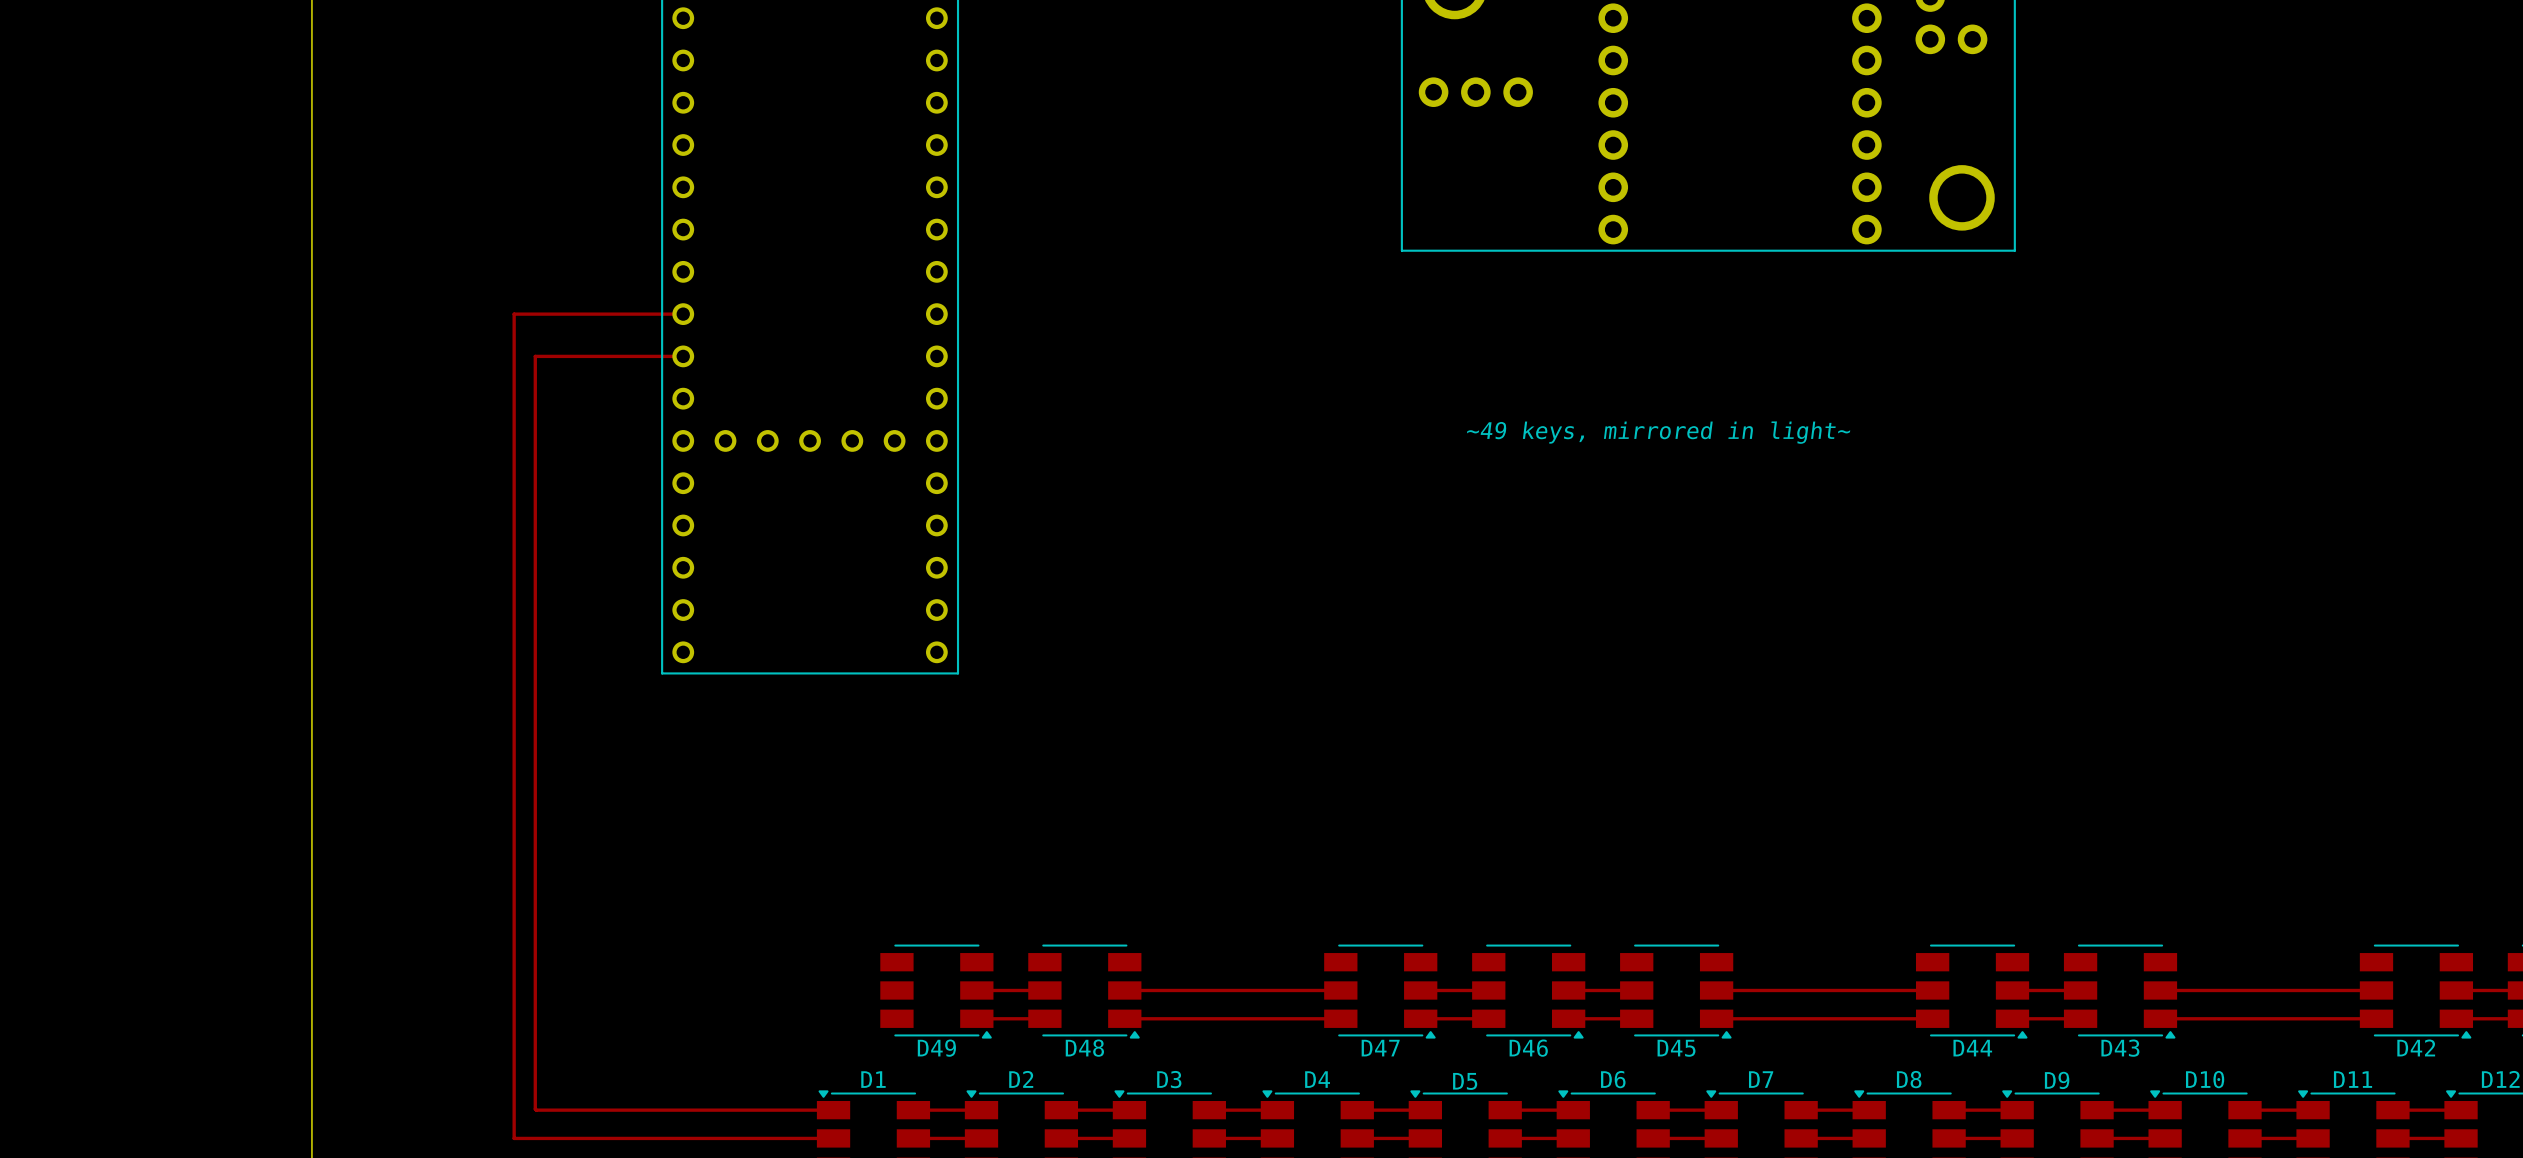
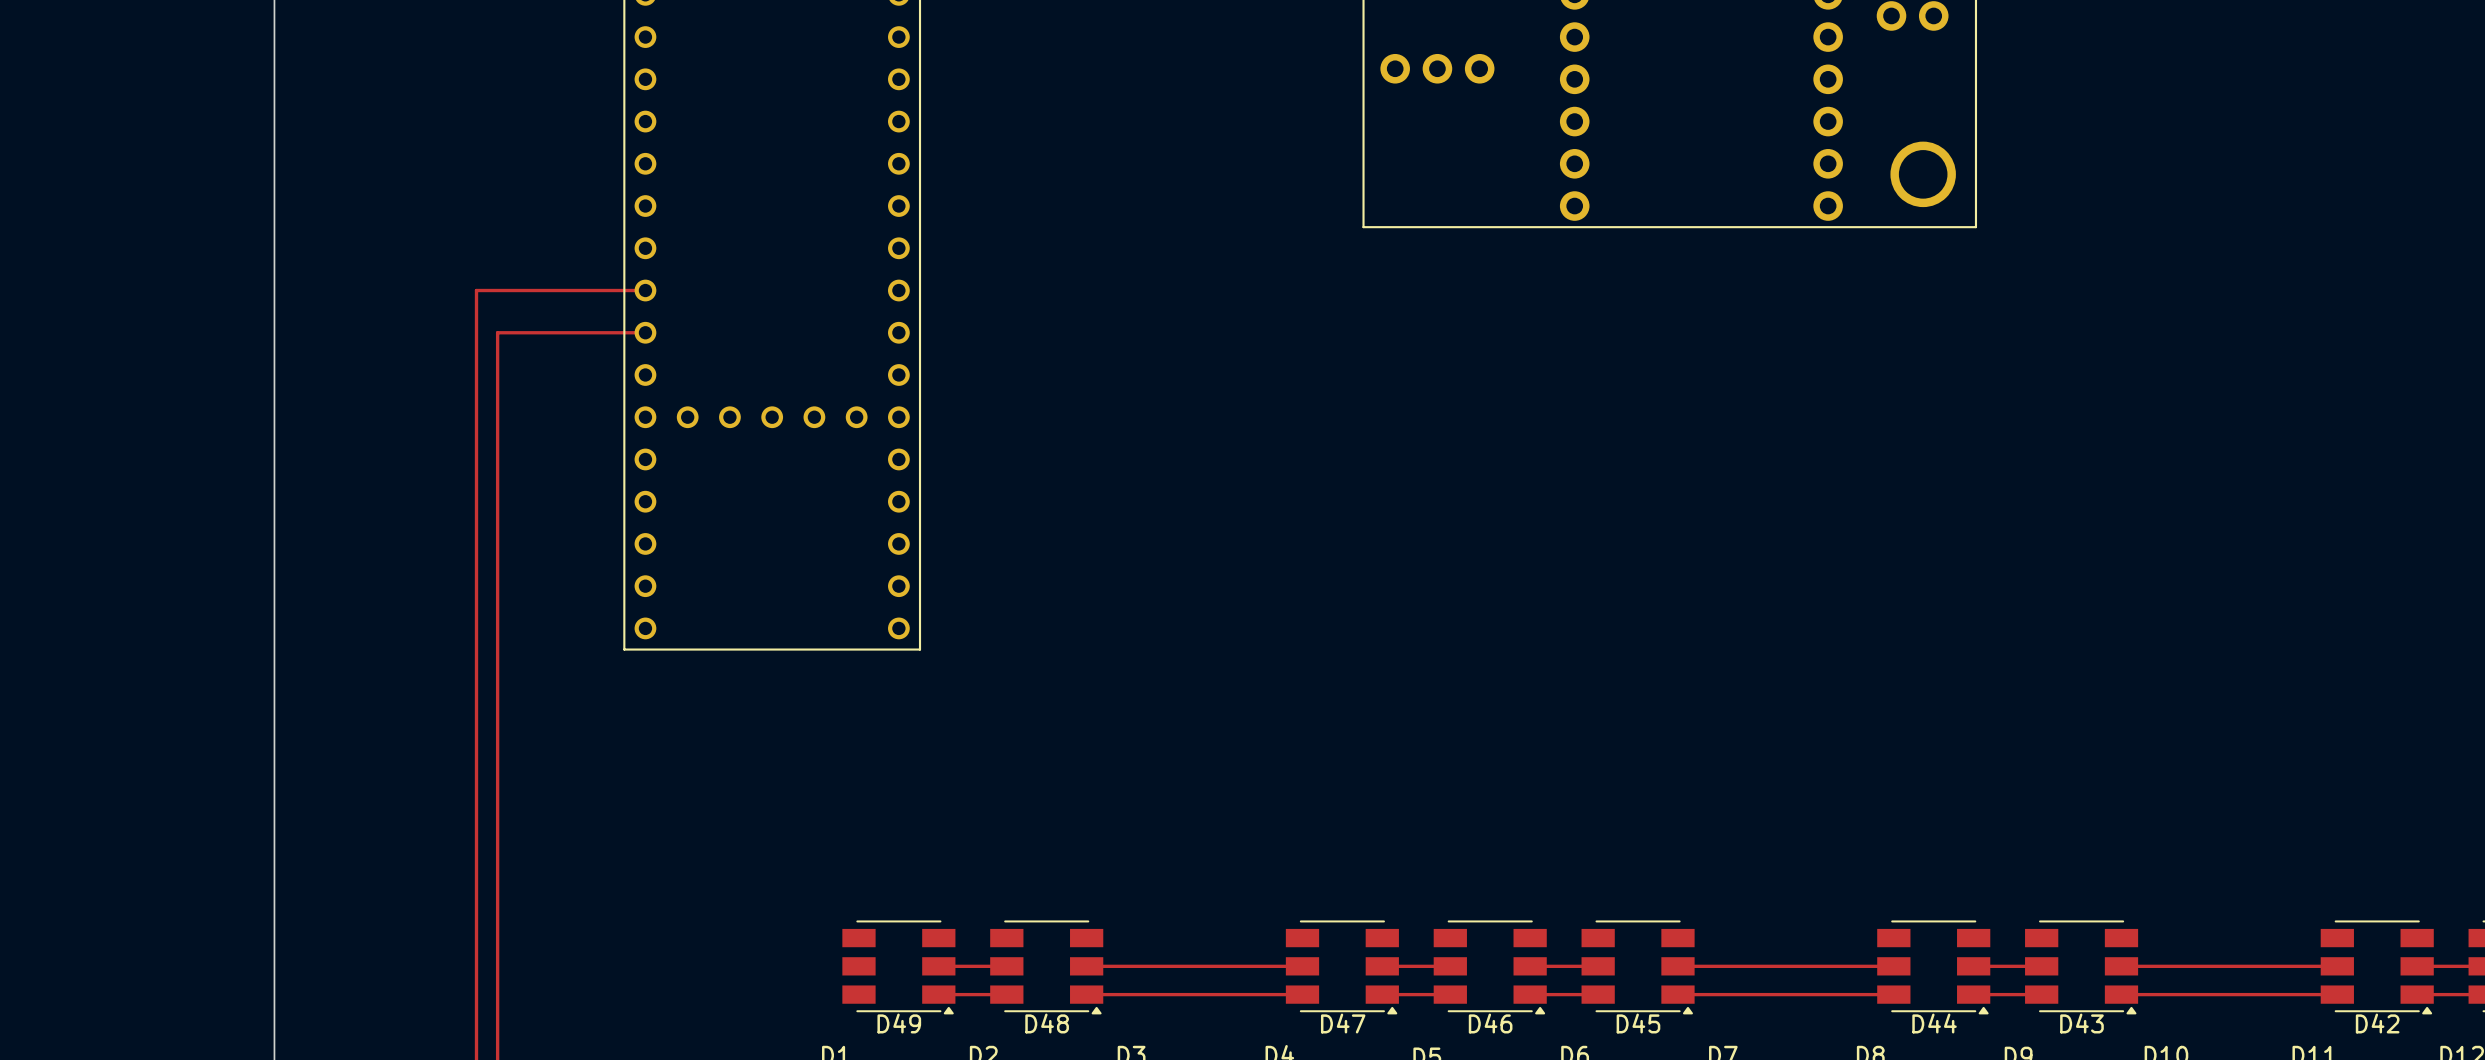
text: ~49 keys, mirrored in light~ (1658, 432) -> none

